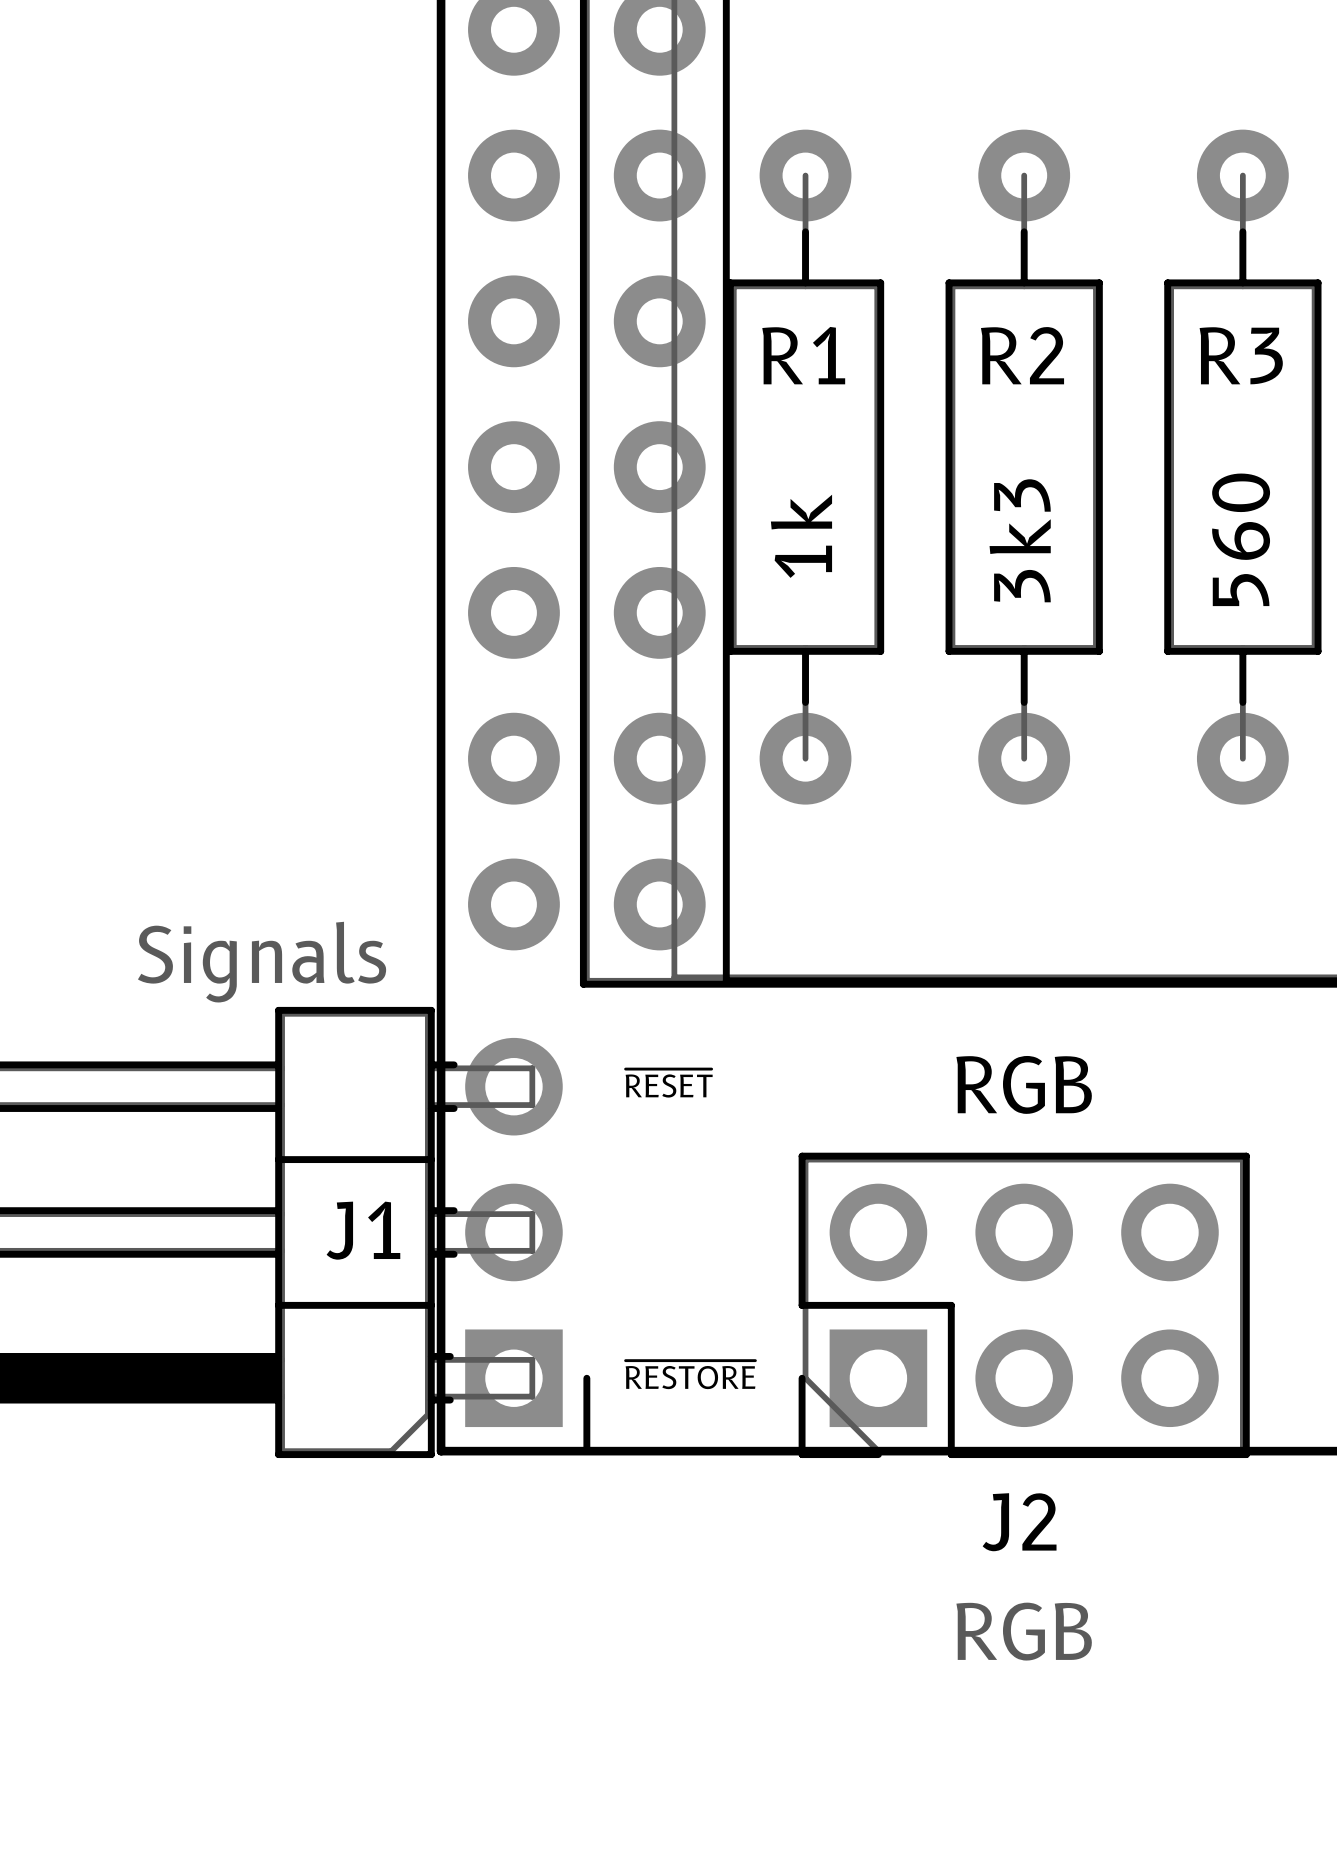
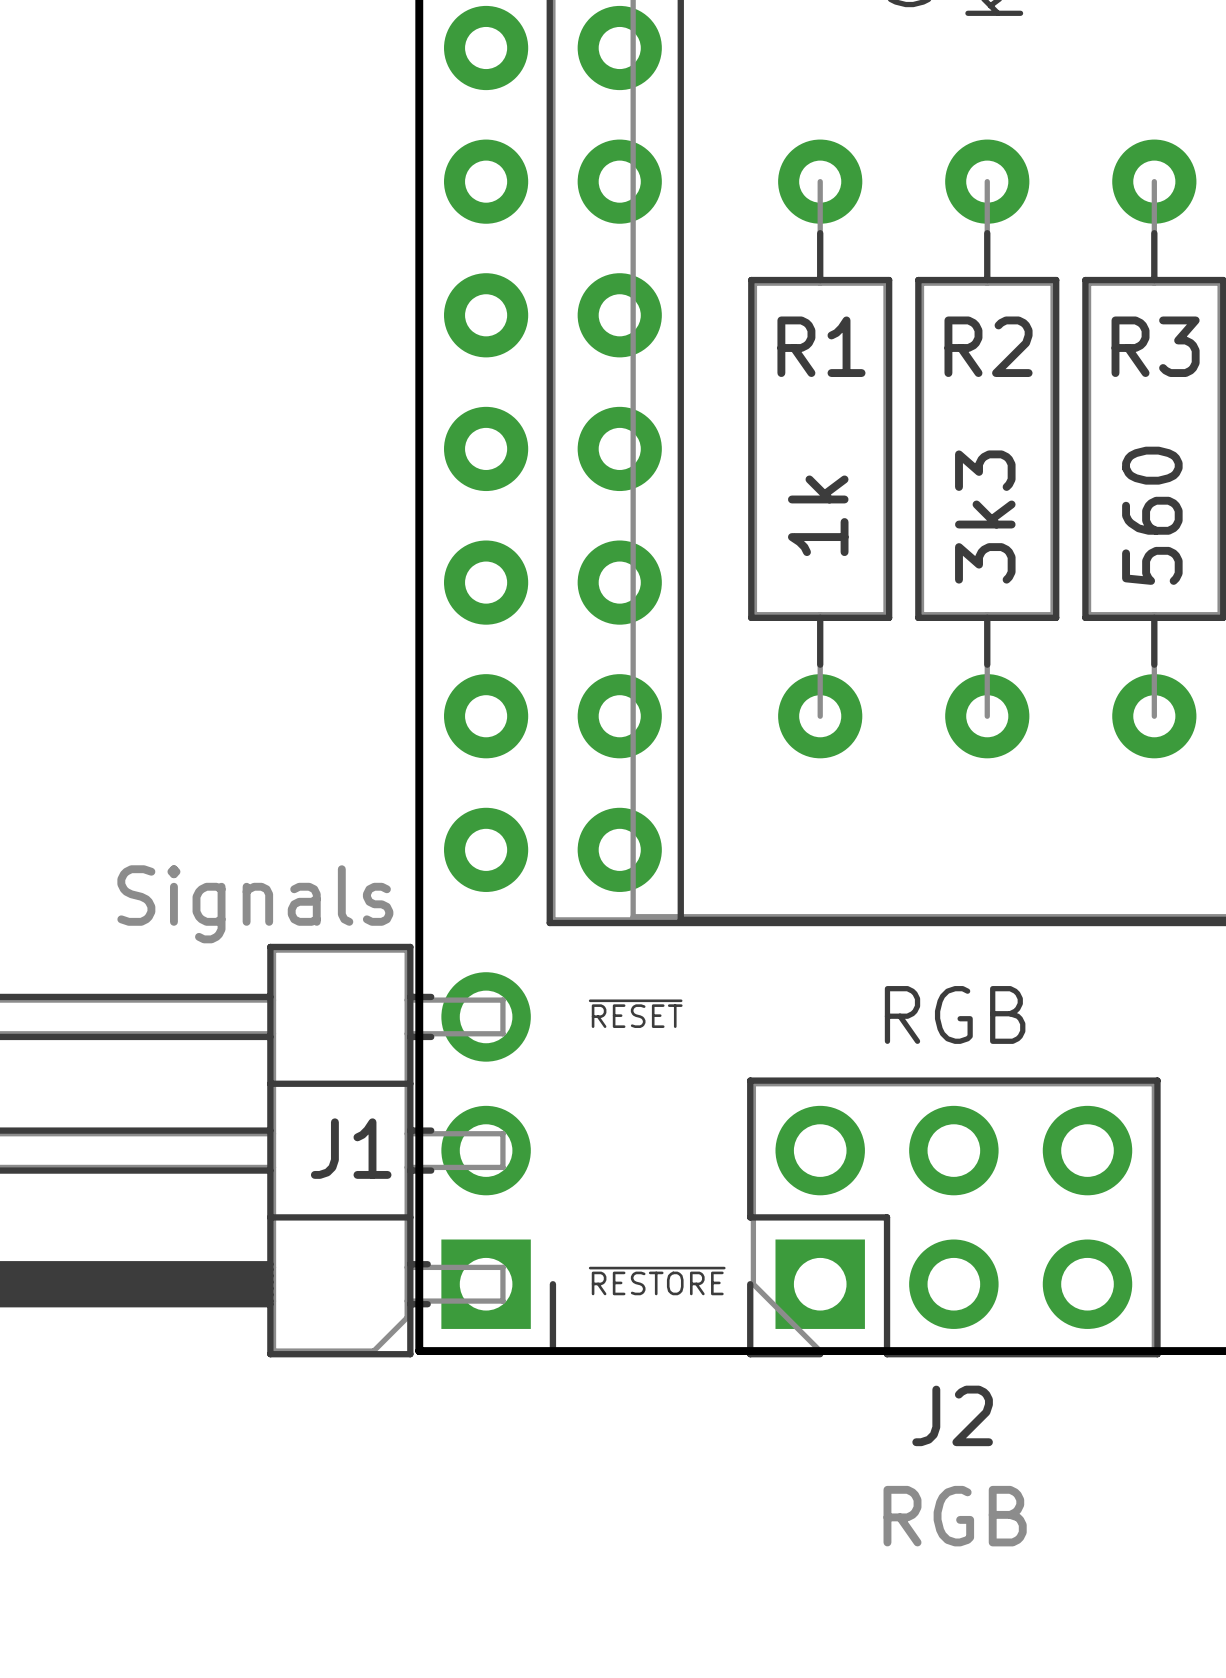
R1 position: (805, 467) -> (820, 448)
R2 position: (1024, 467) -> (987, 448)

